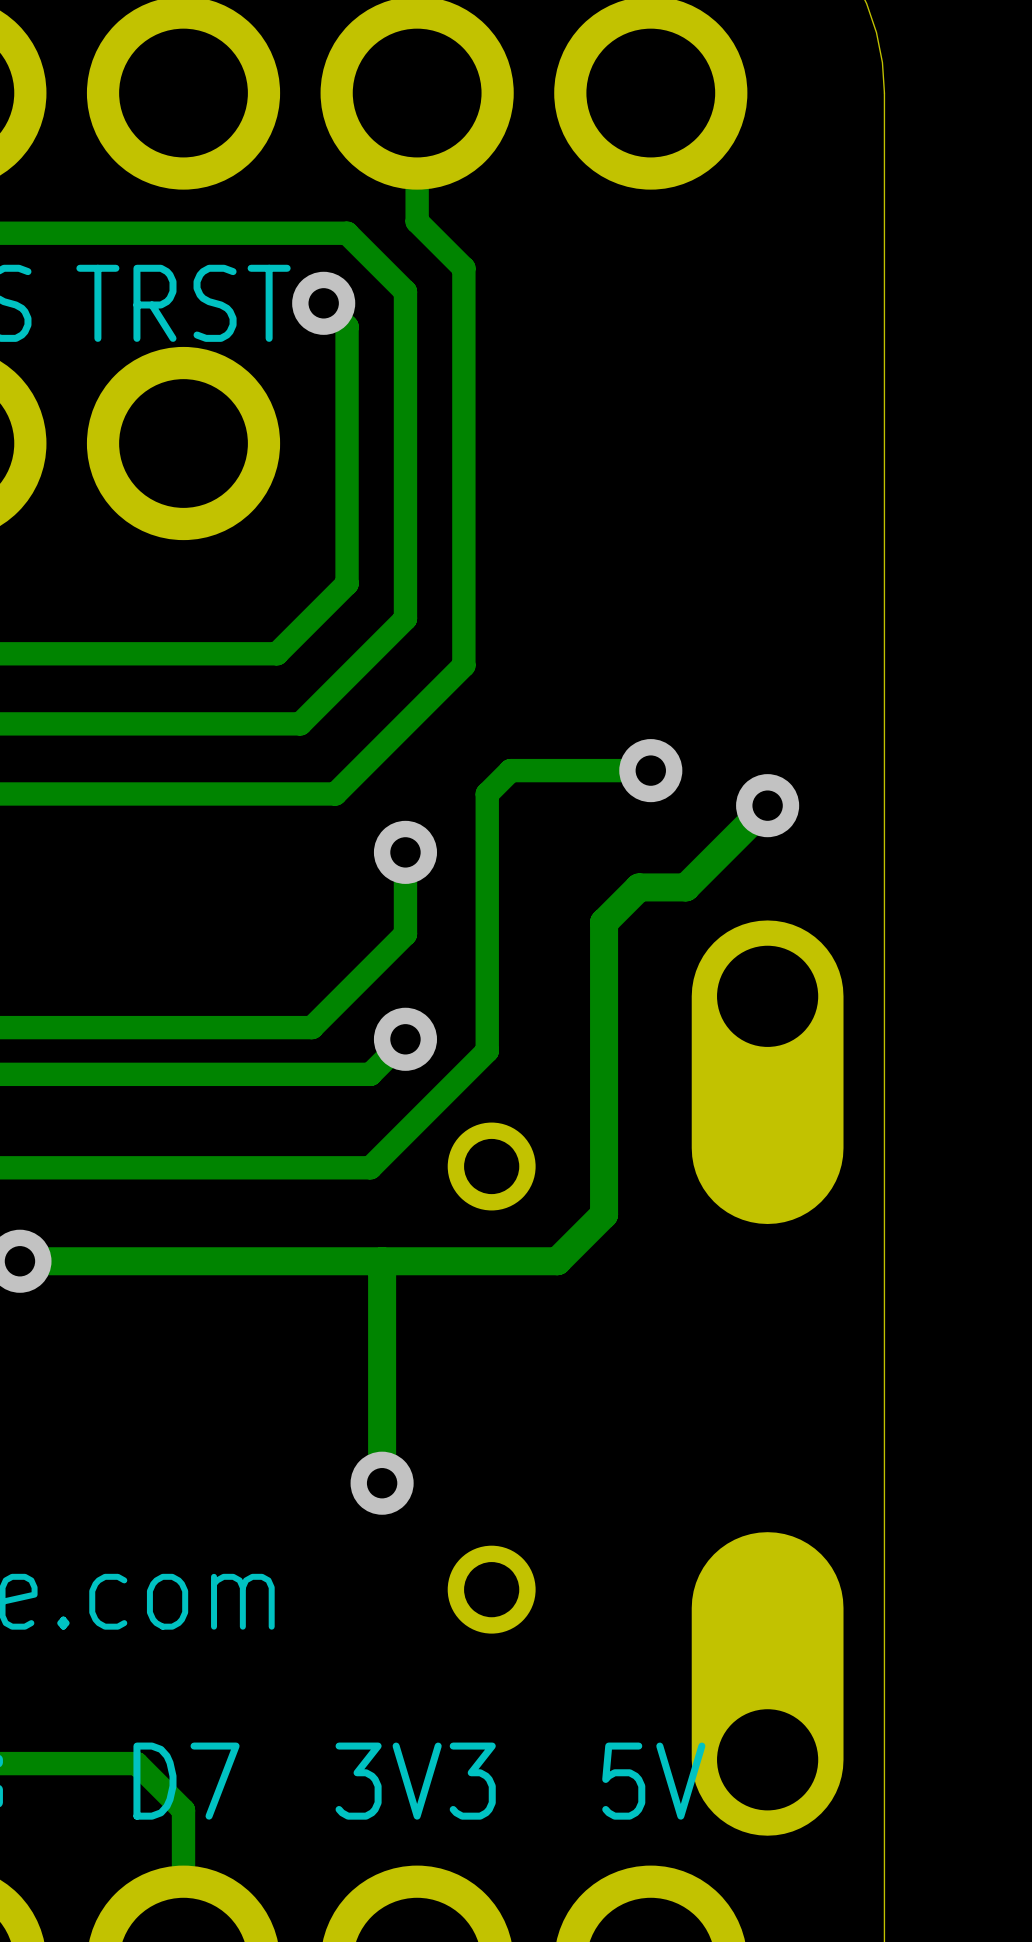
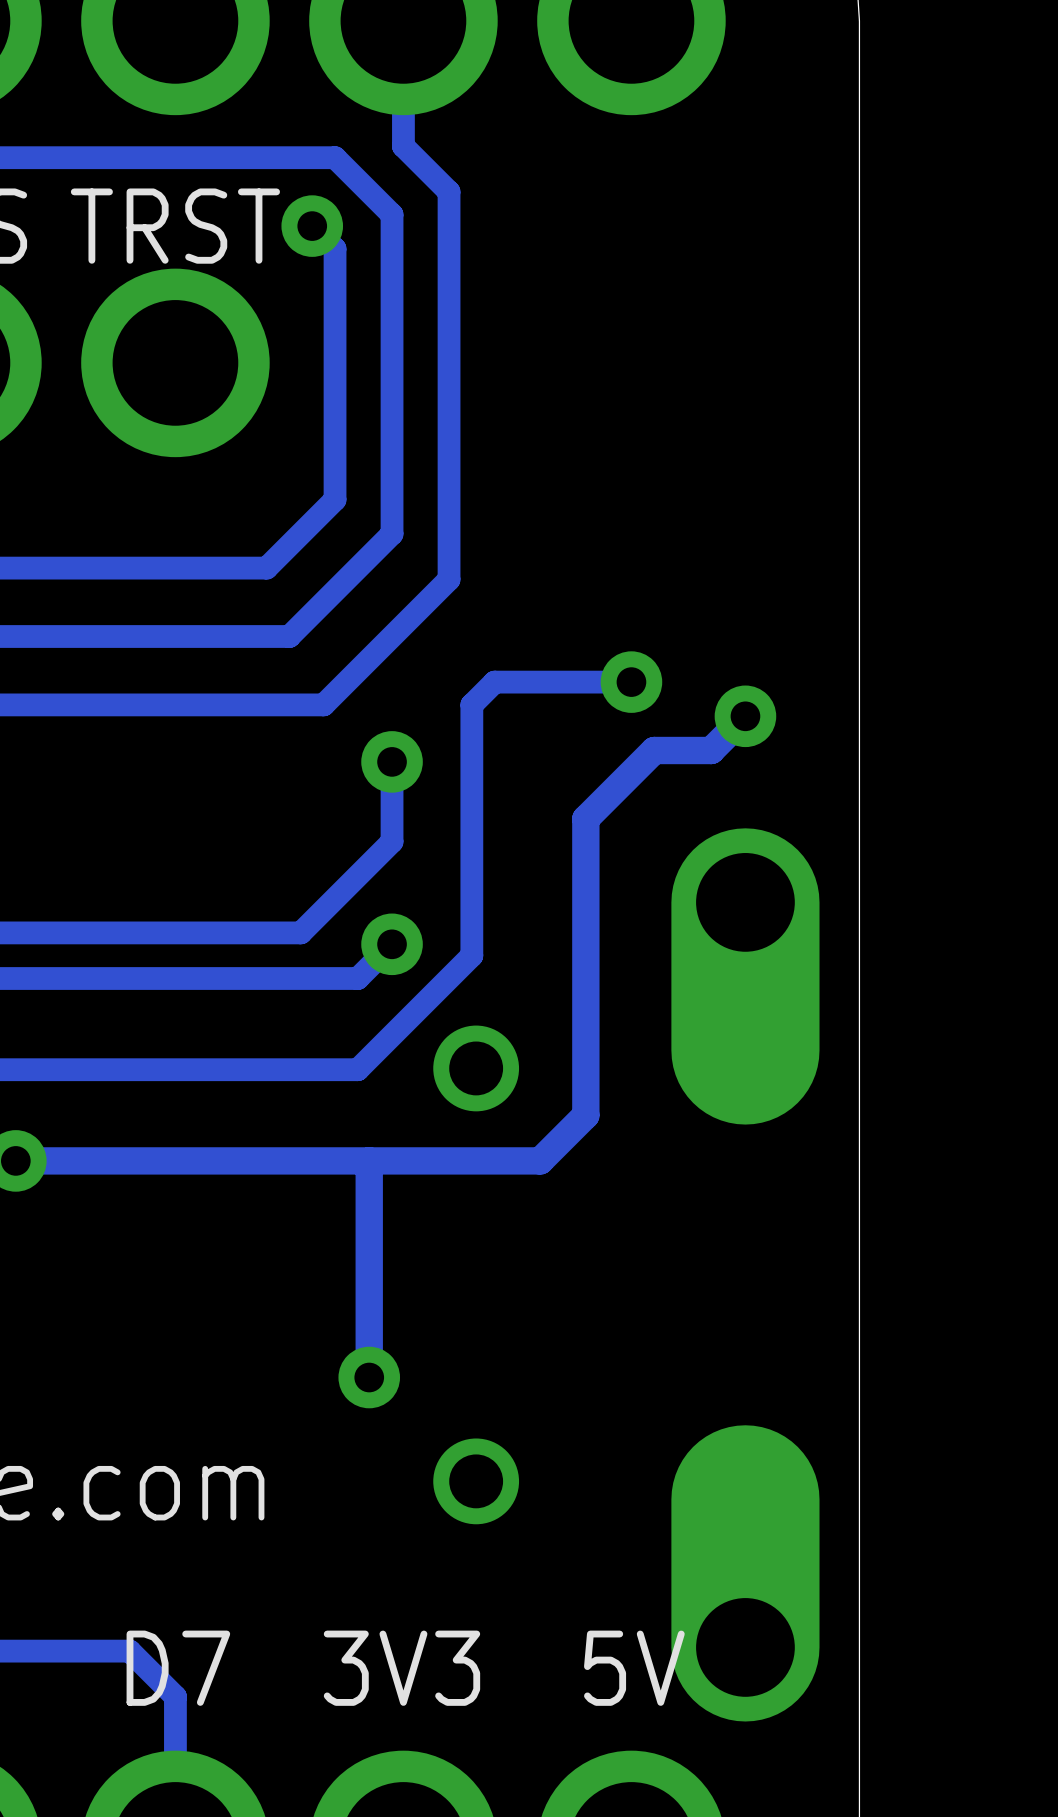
track: (732, 840) (685, 887) (639, 887) (604, 922) -> (711, 750) (654, 750) (585, 818) (585, 830)

